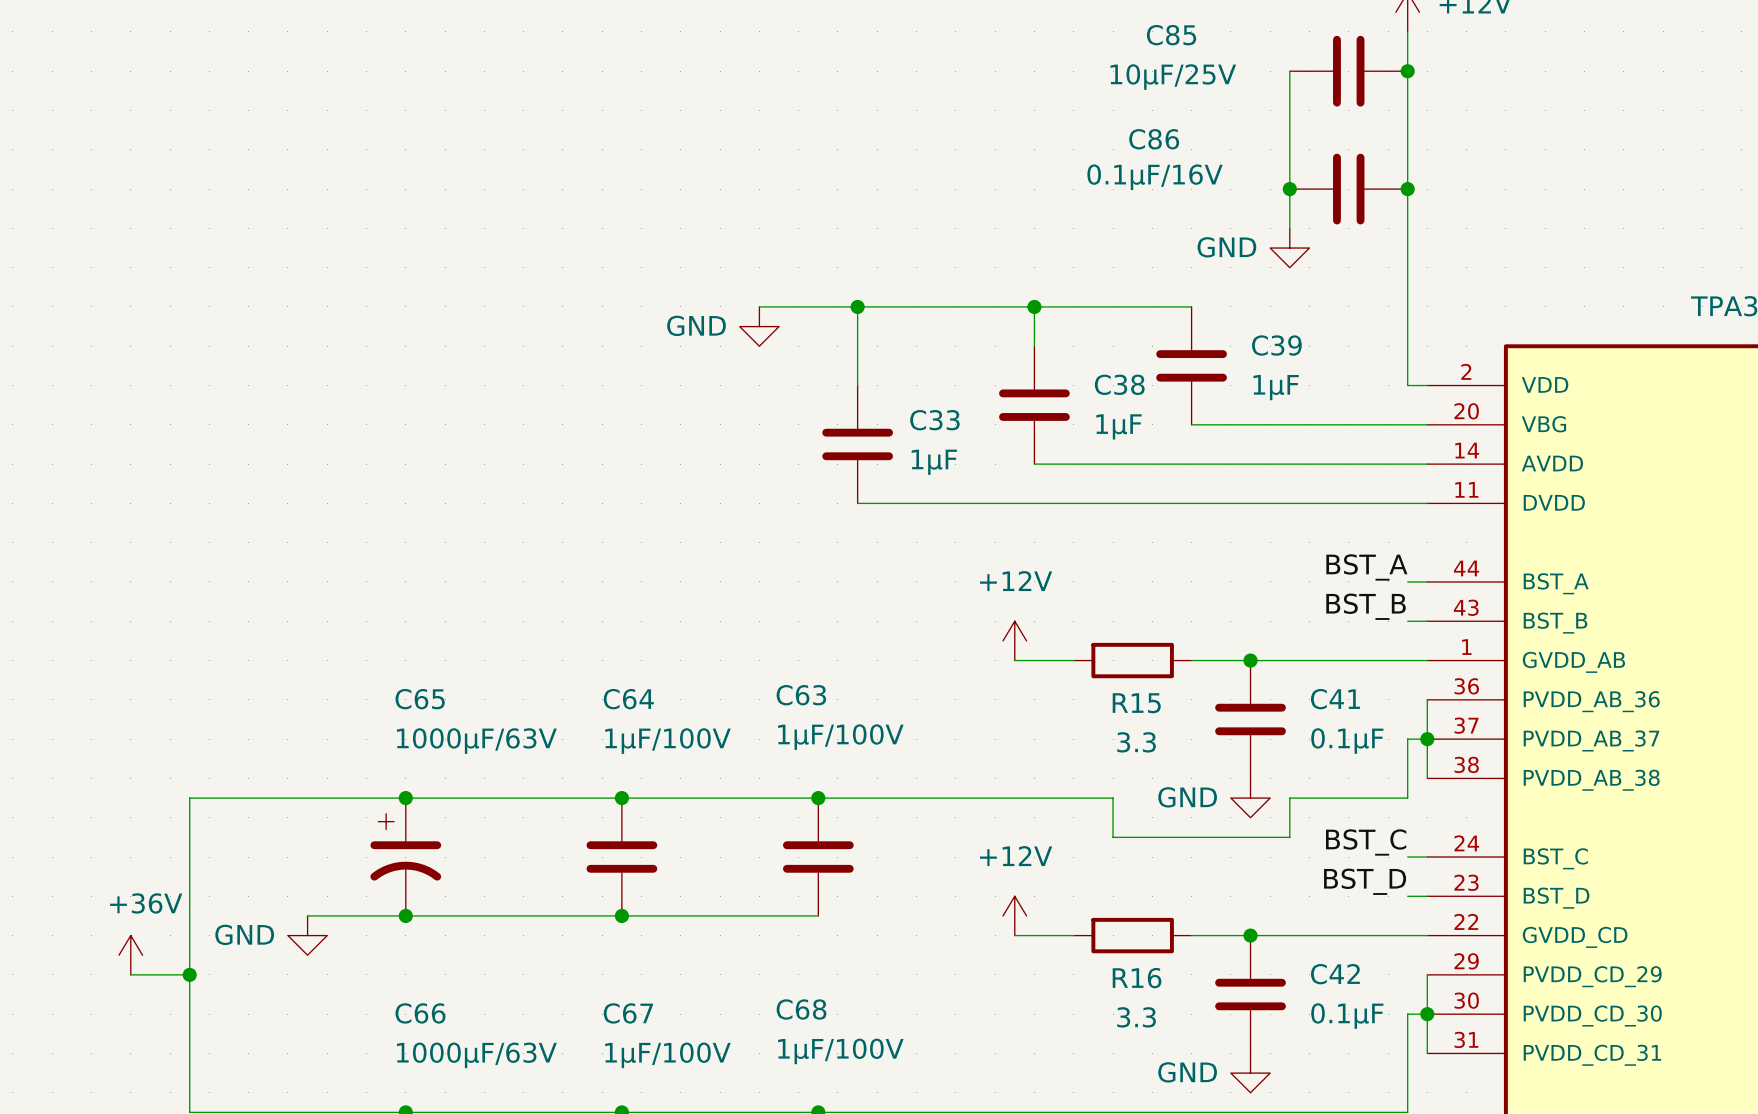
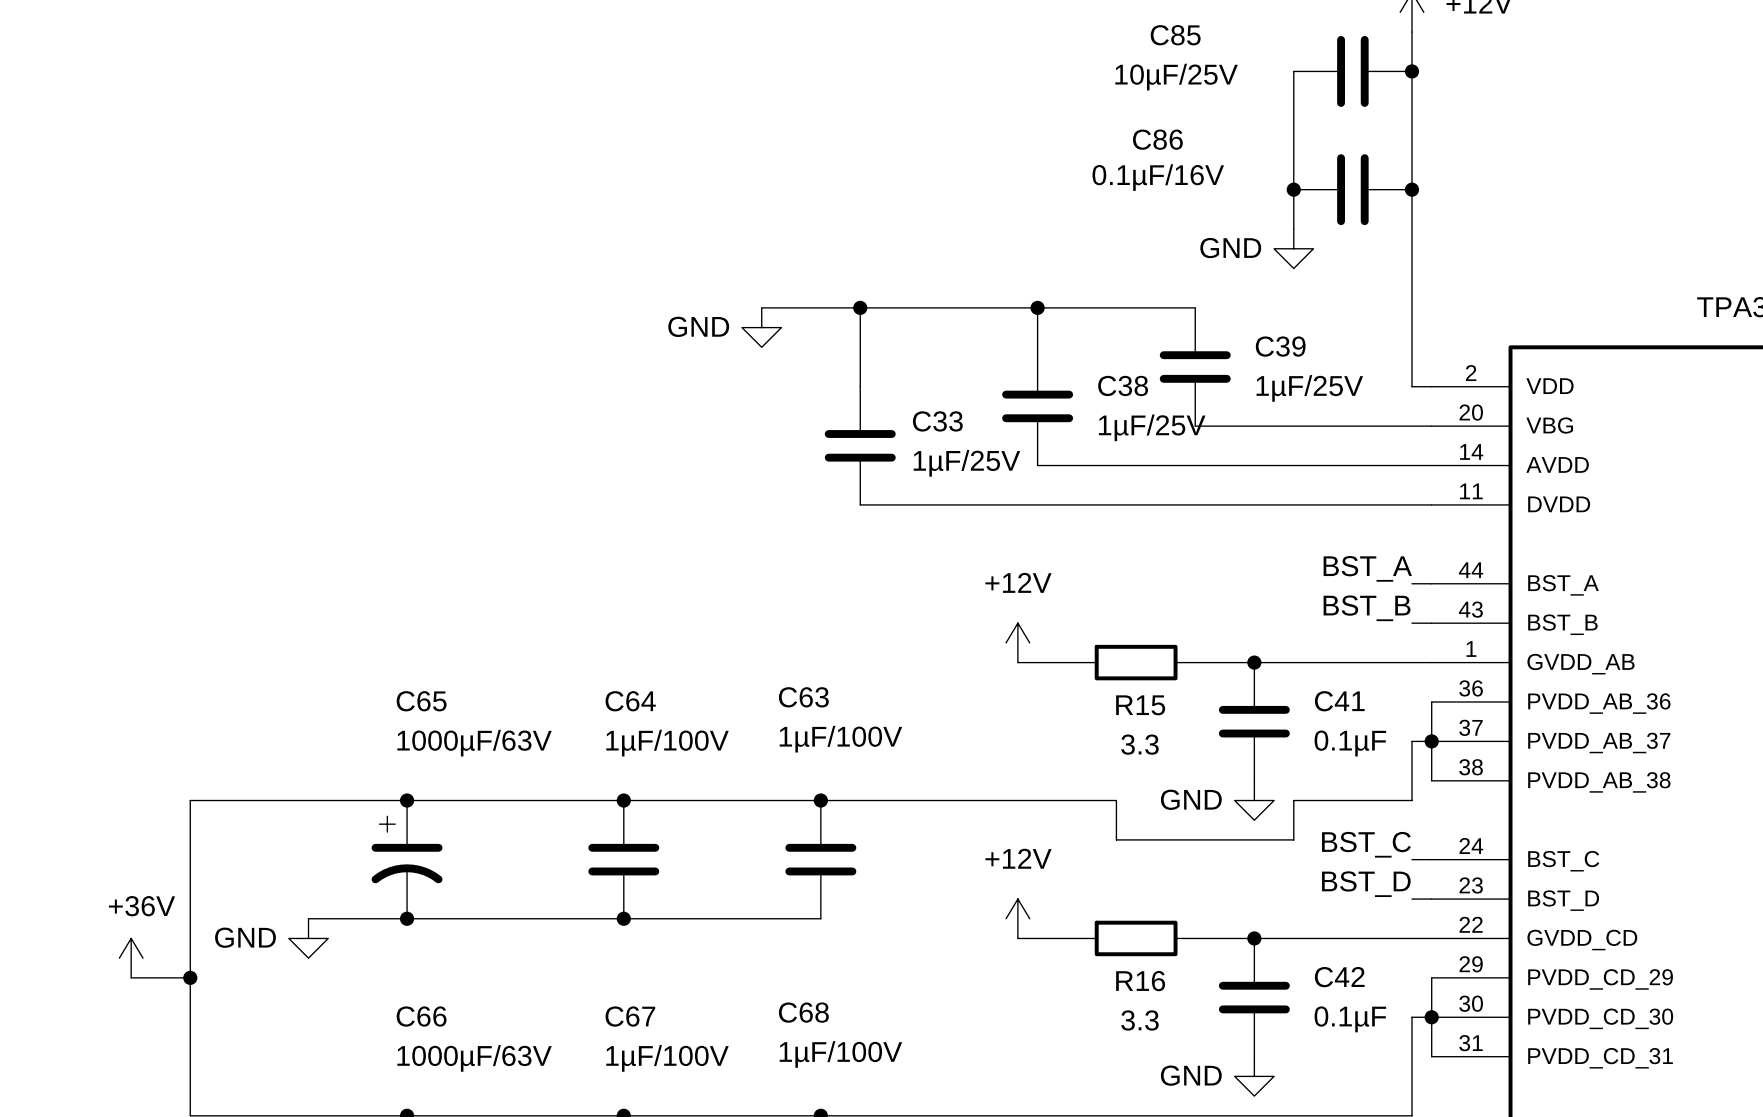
C39 value: 1µF (1276, 387) -> 1µF/25V (1309, 388)
C38 value: 1µF (1118, 426) -> 1µF/25V (1152, 427)
C33 value: 1µF (934, 462) -> 1µF/25V (966, 463)

